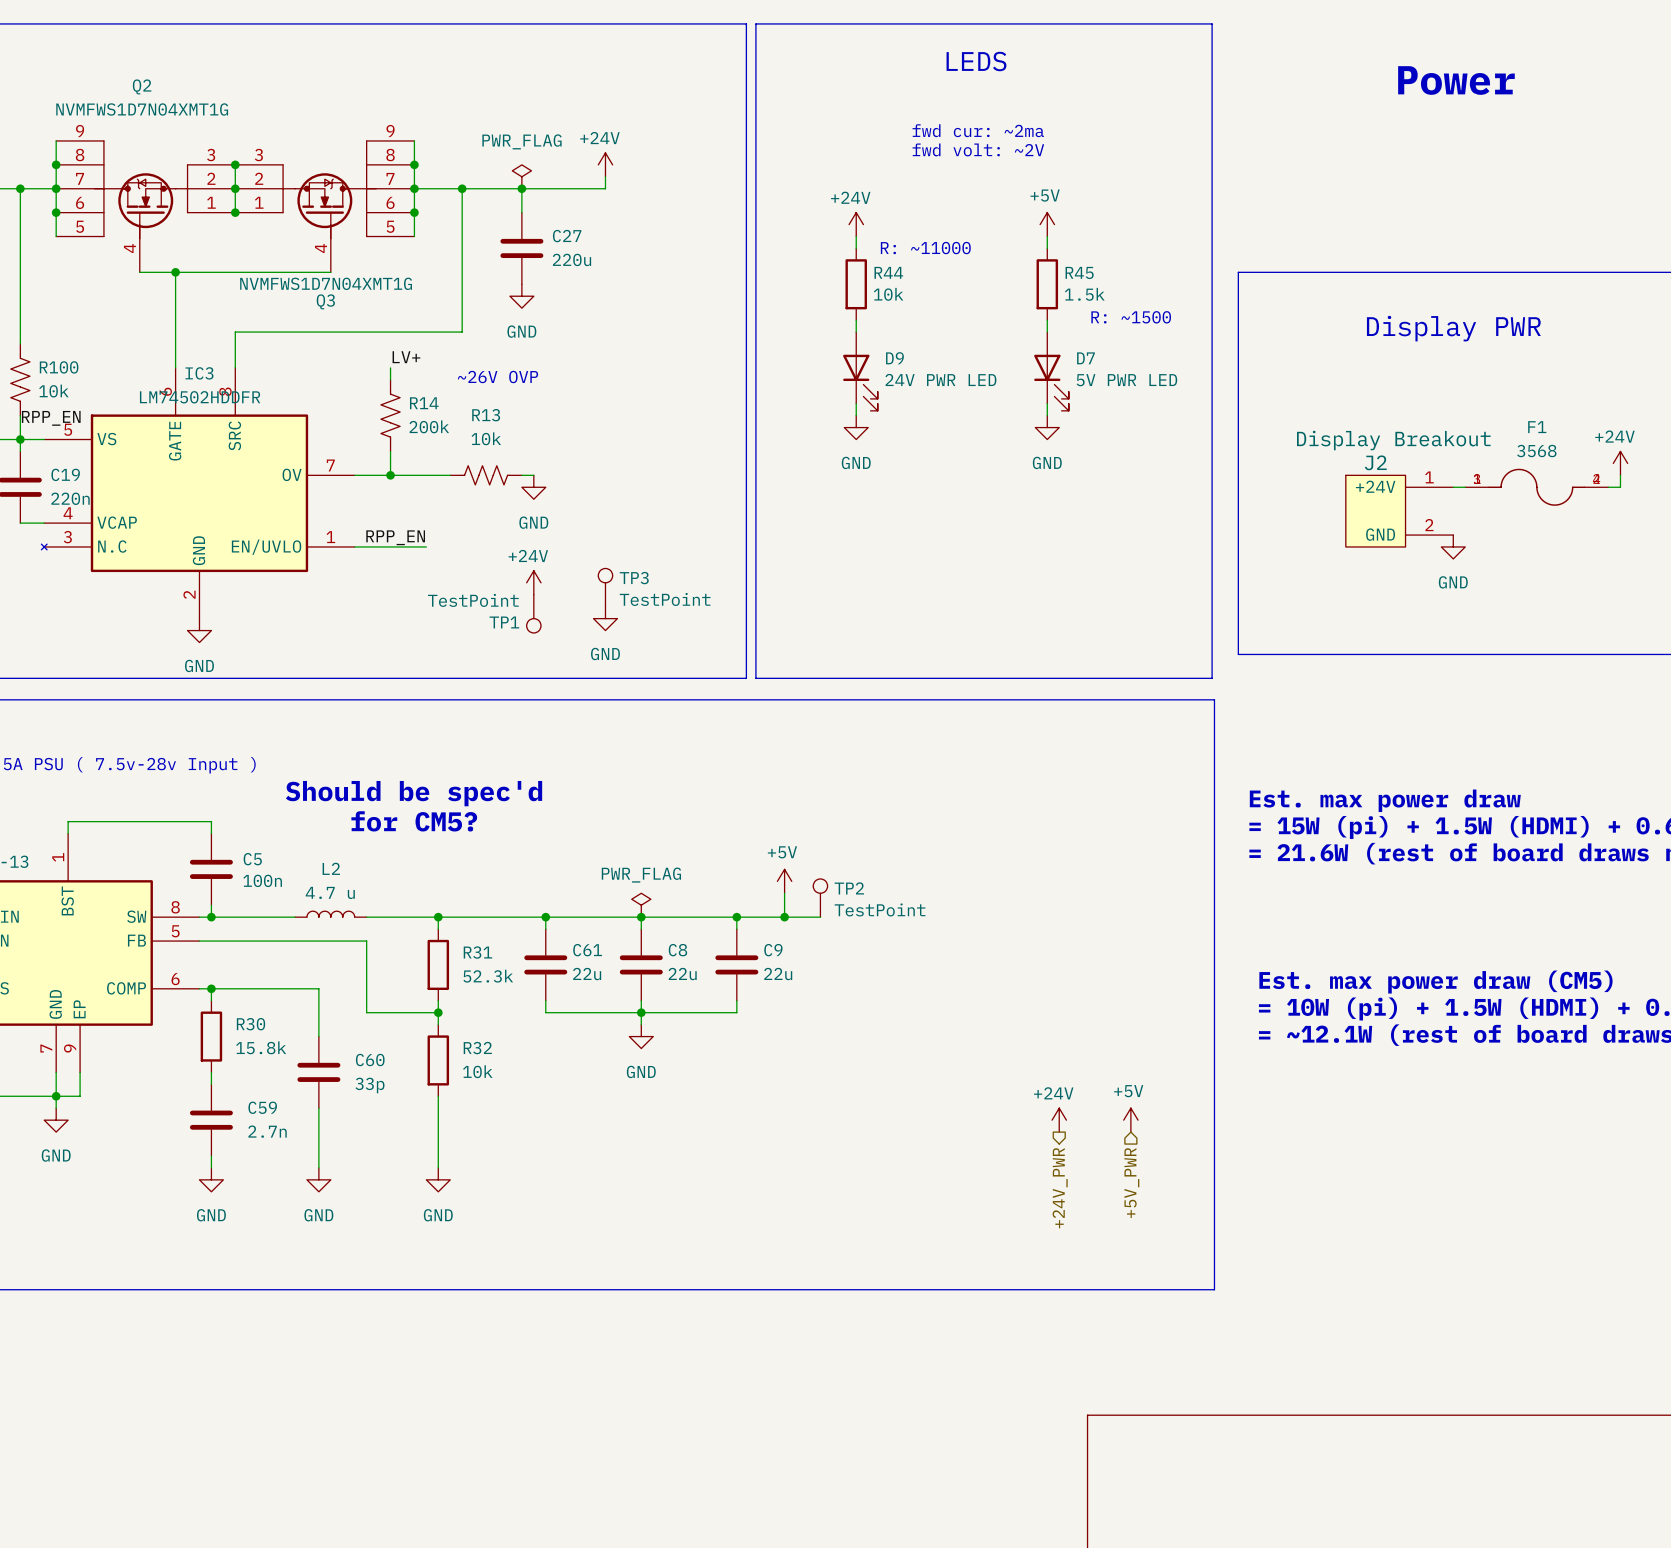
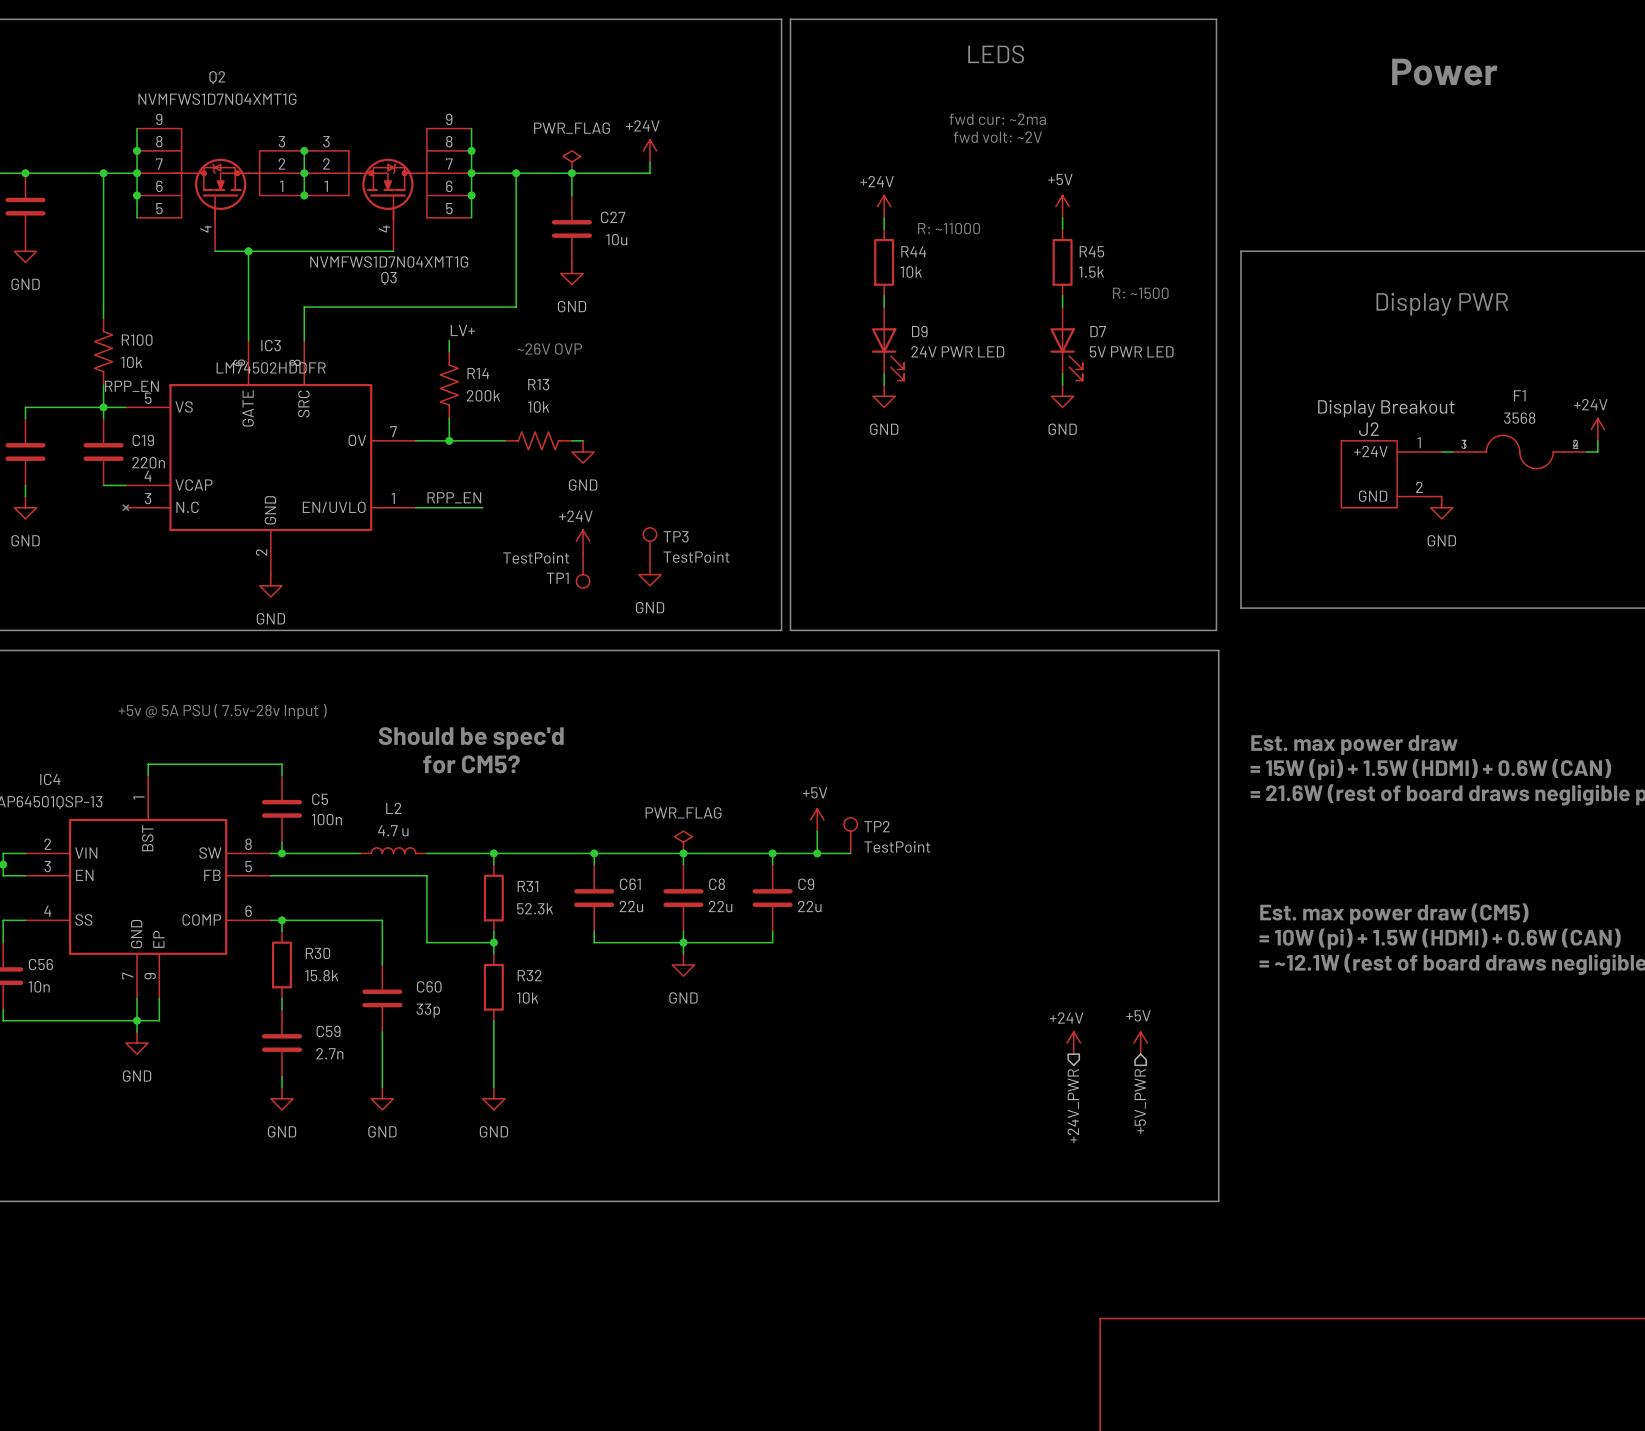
C27 value: 220u (571, 259) -> 10u (616, 239)

